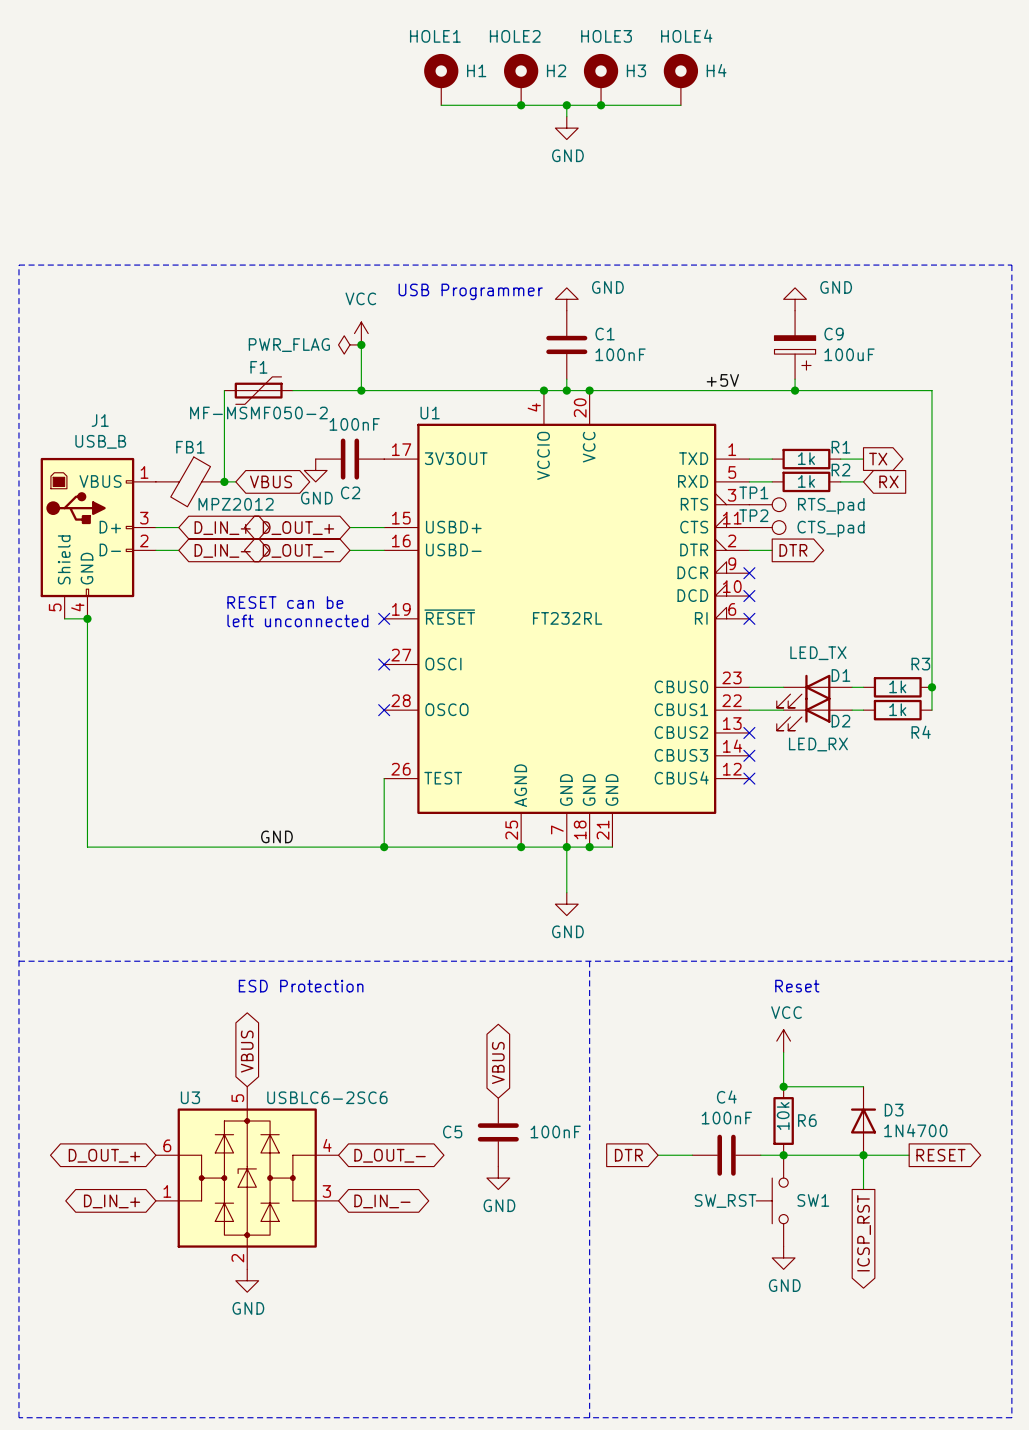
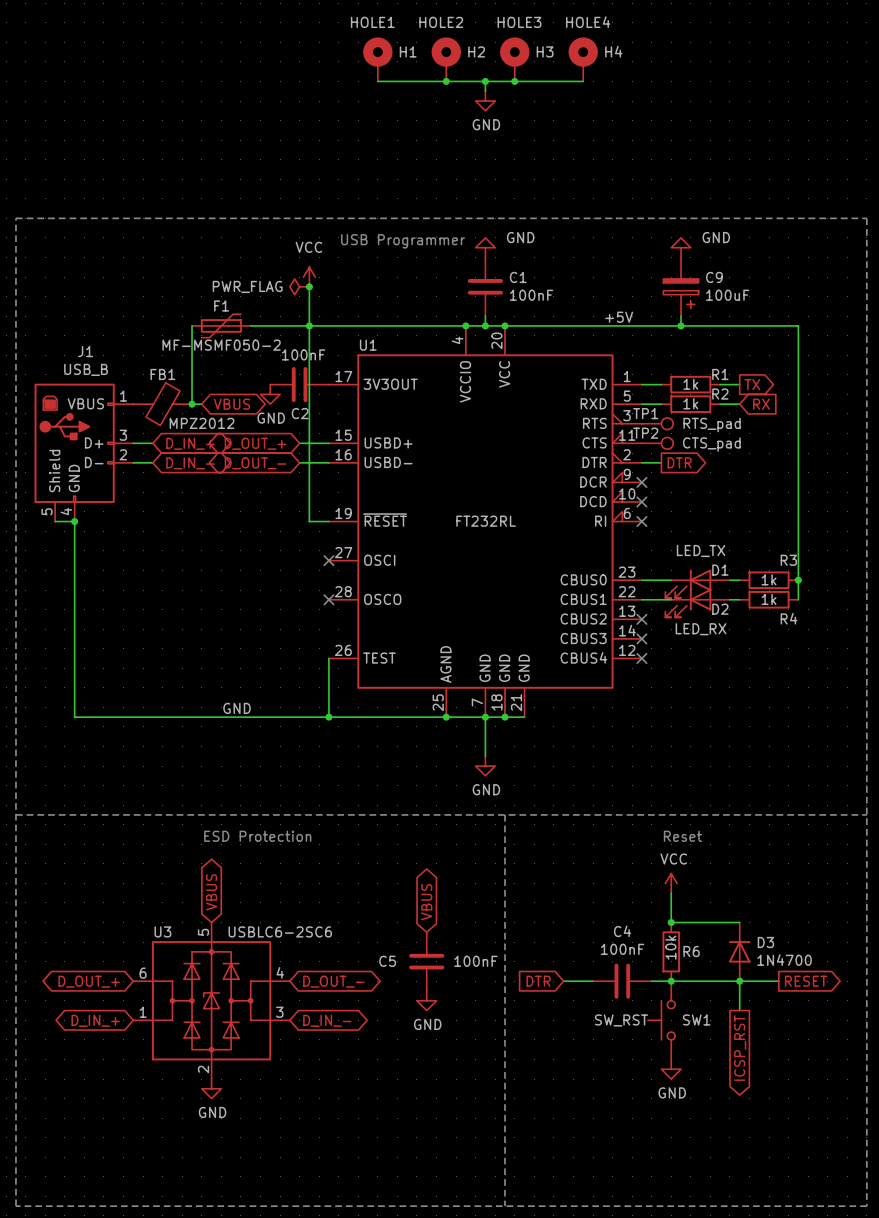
wire: none -> (309, 325) (309, 521) (328, 521)
text: RESET can be (285, 602) -> none
no-connect mark: (384, 618) -> none
text: left unconnected (297, 620) -> none

